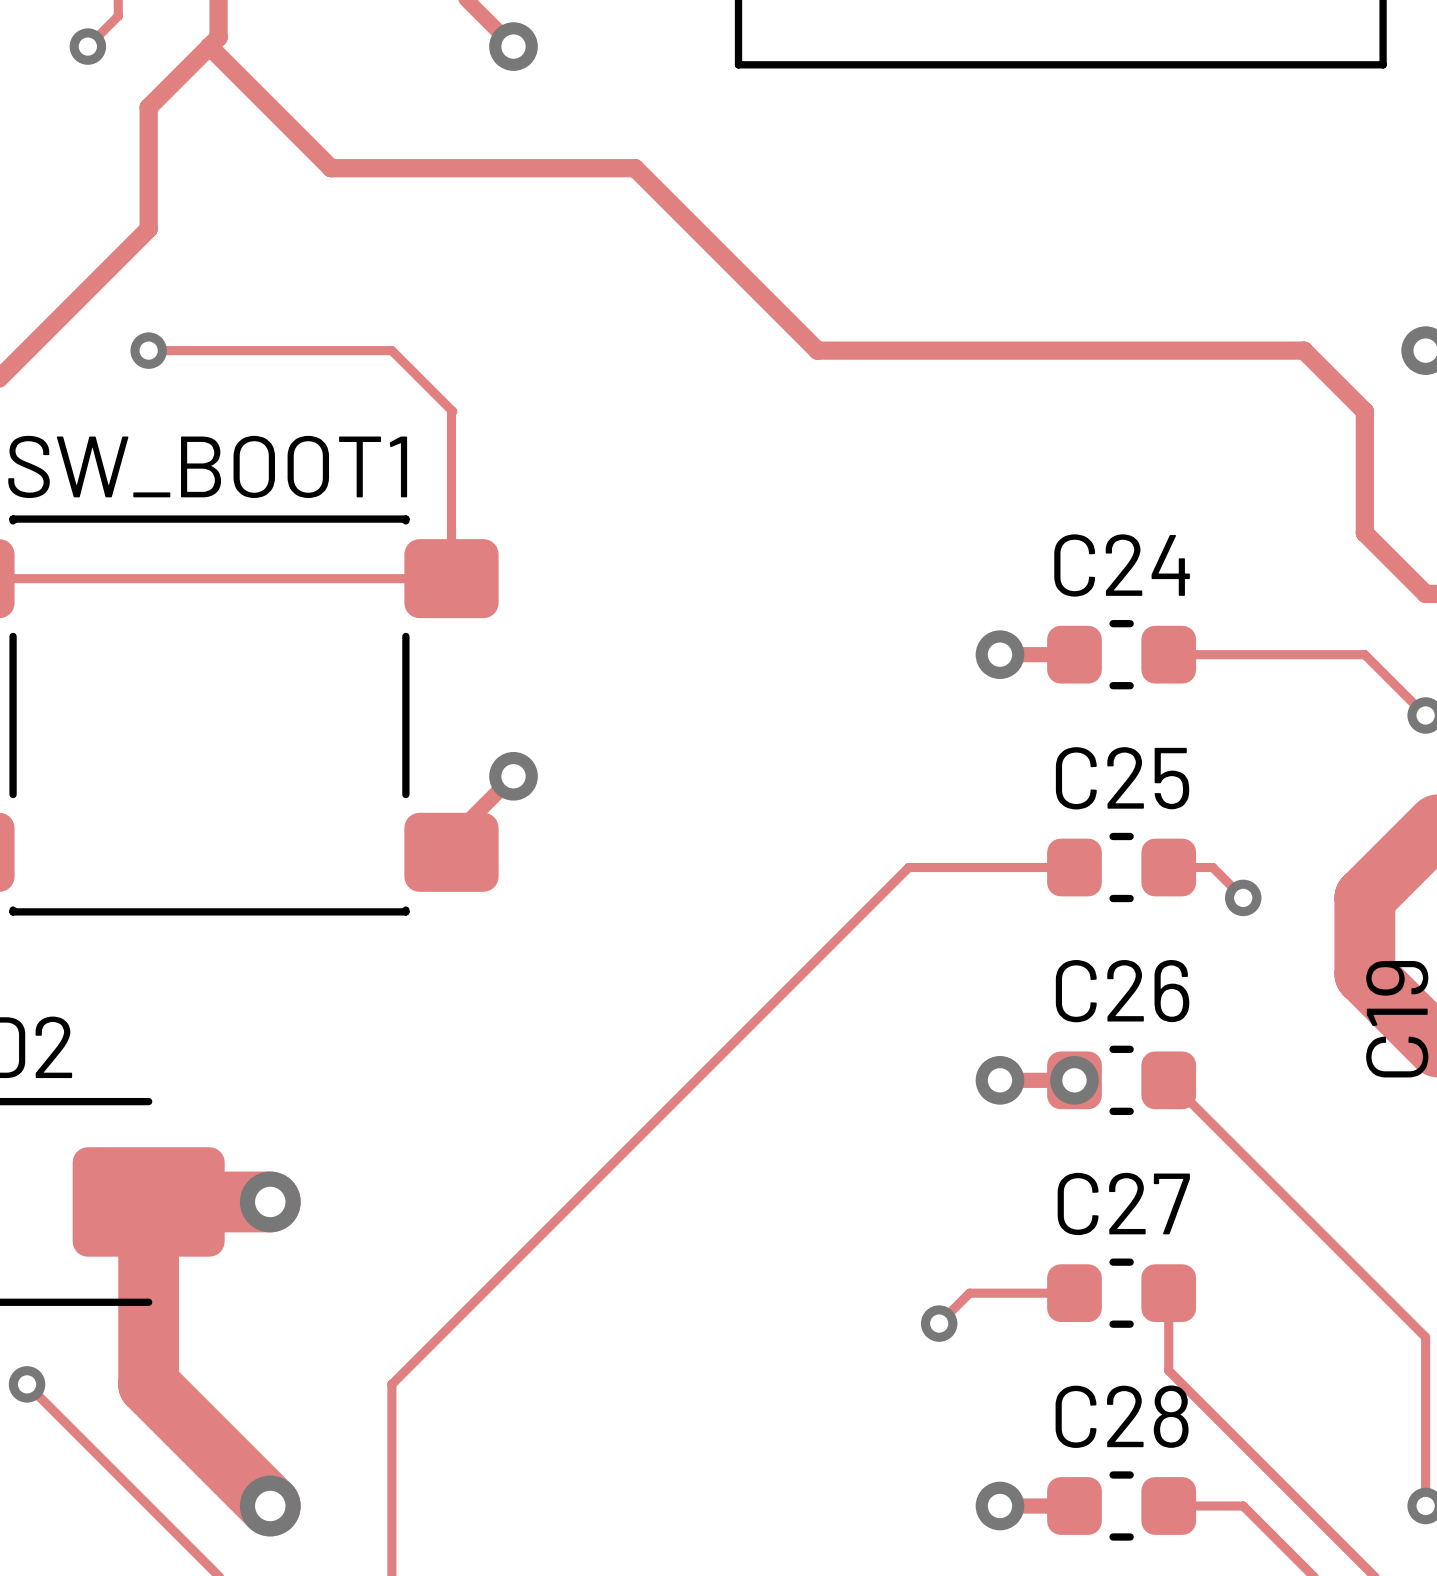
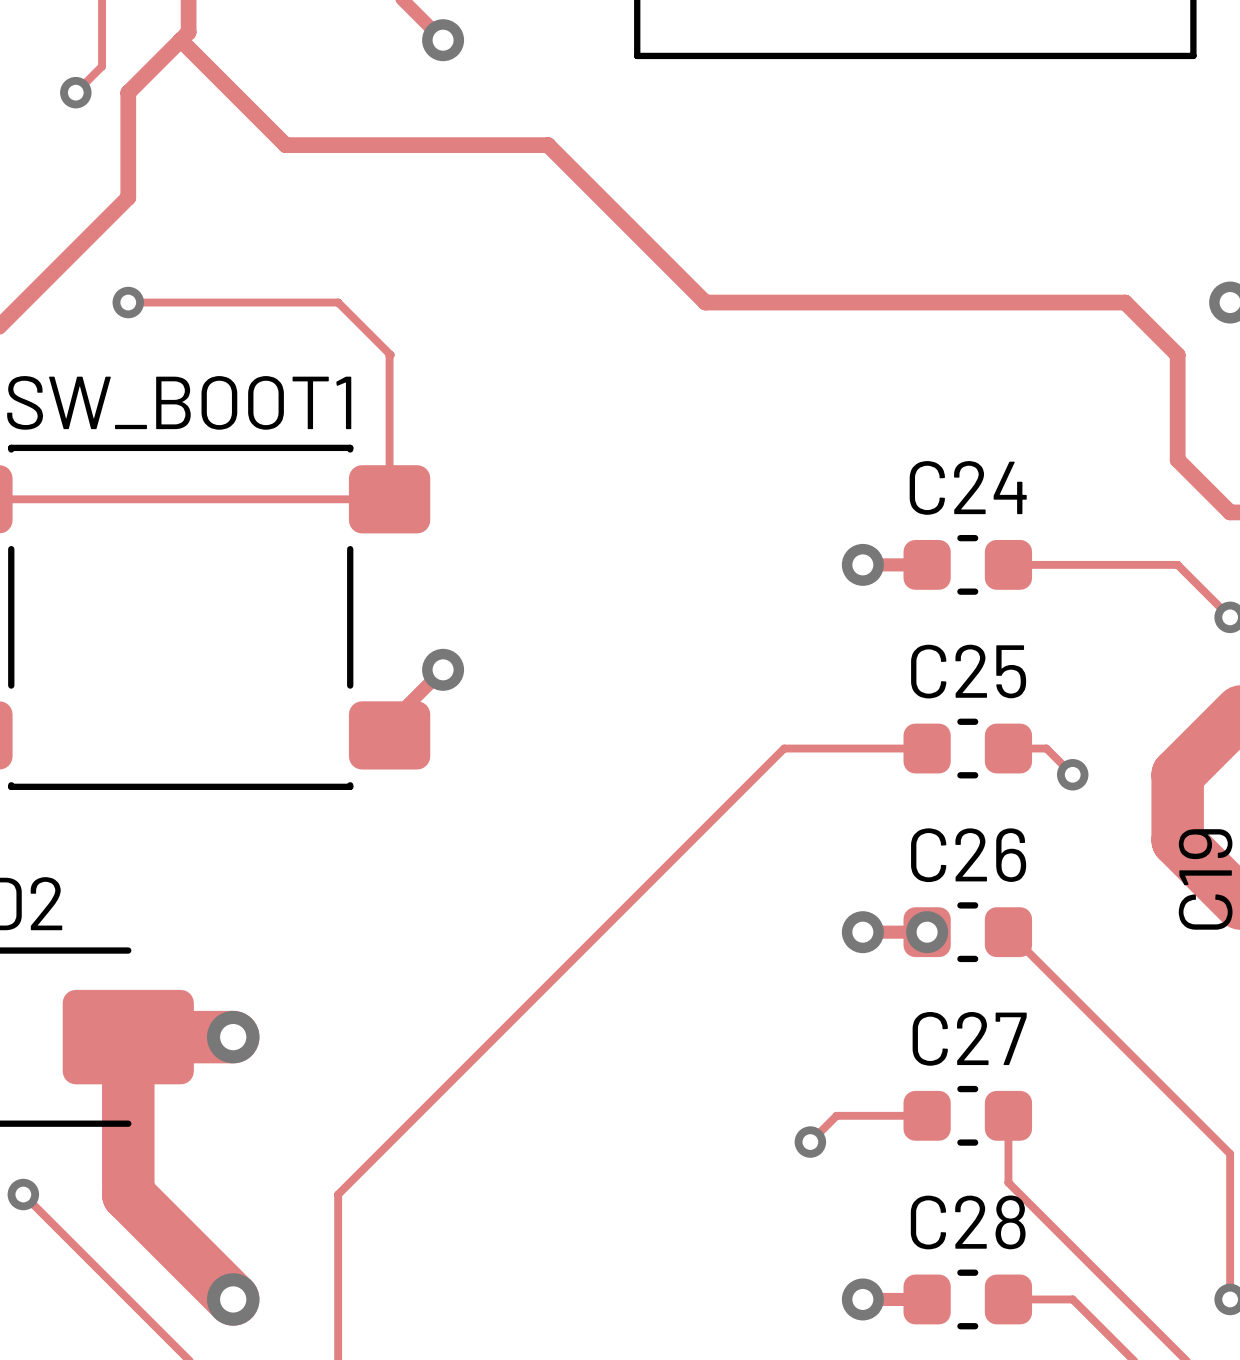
track: (118, 16) (87, 46) -> (102, 13) (102, 66) (75, 92)
via position: (87, 46) -> (75, 92)

